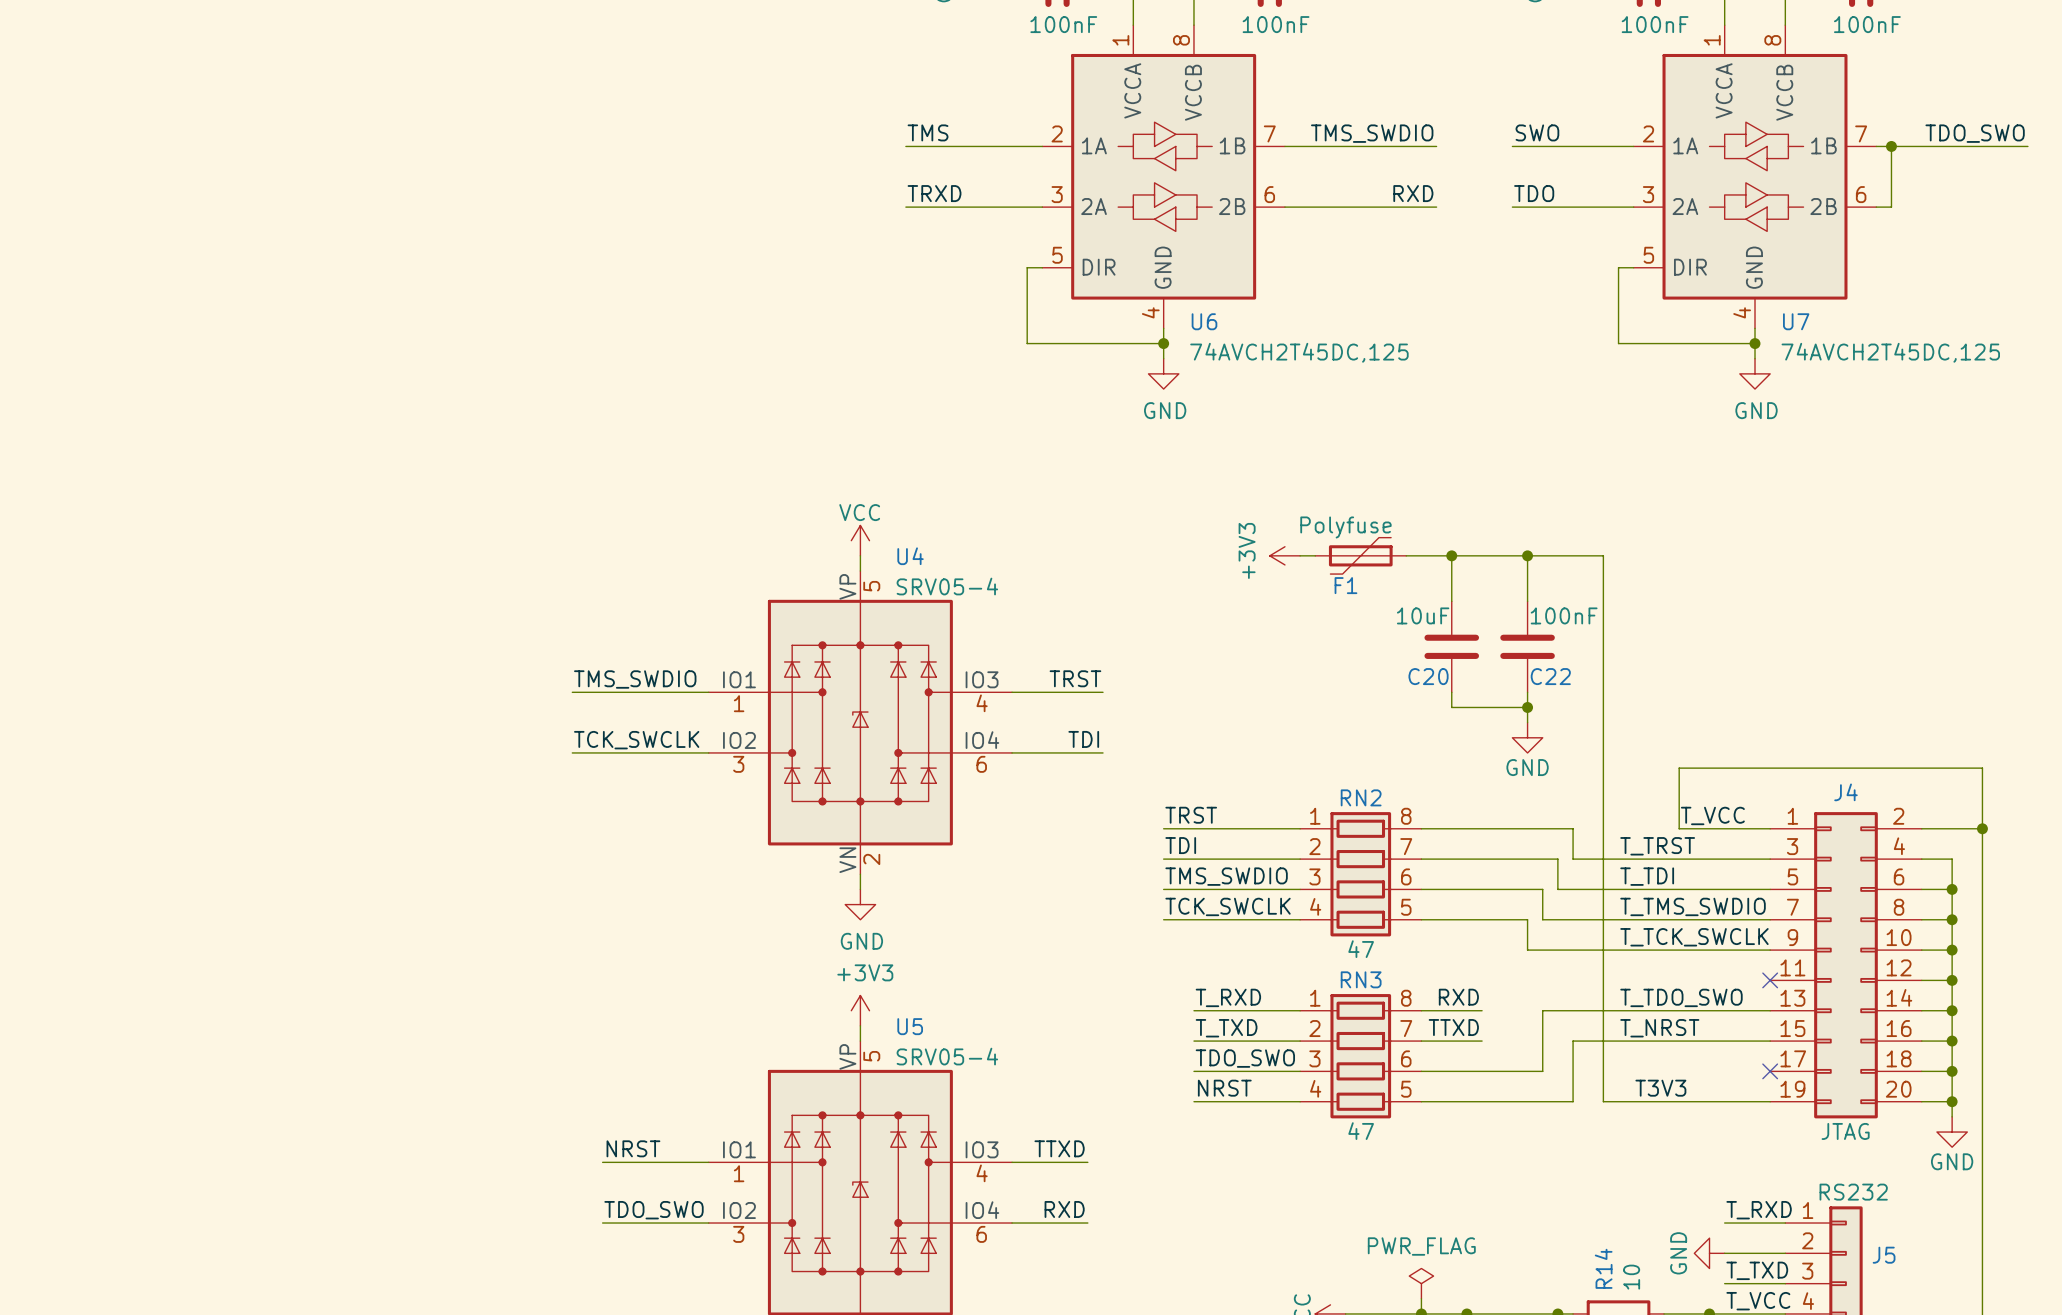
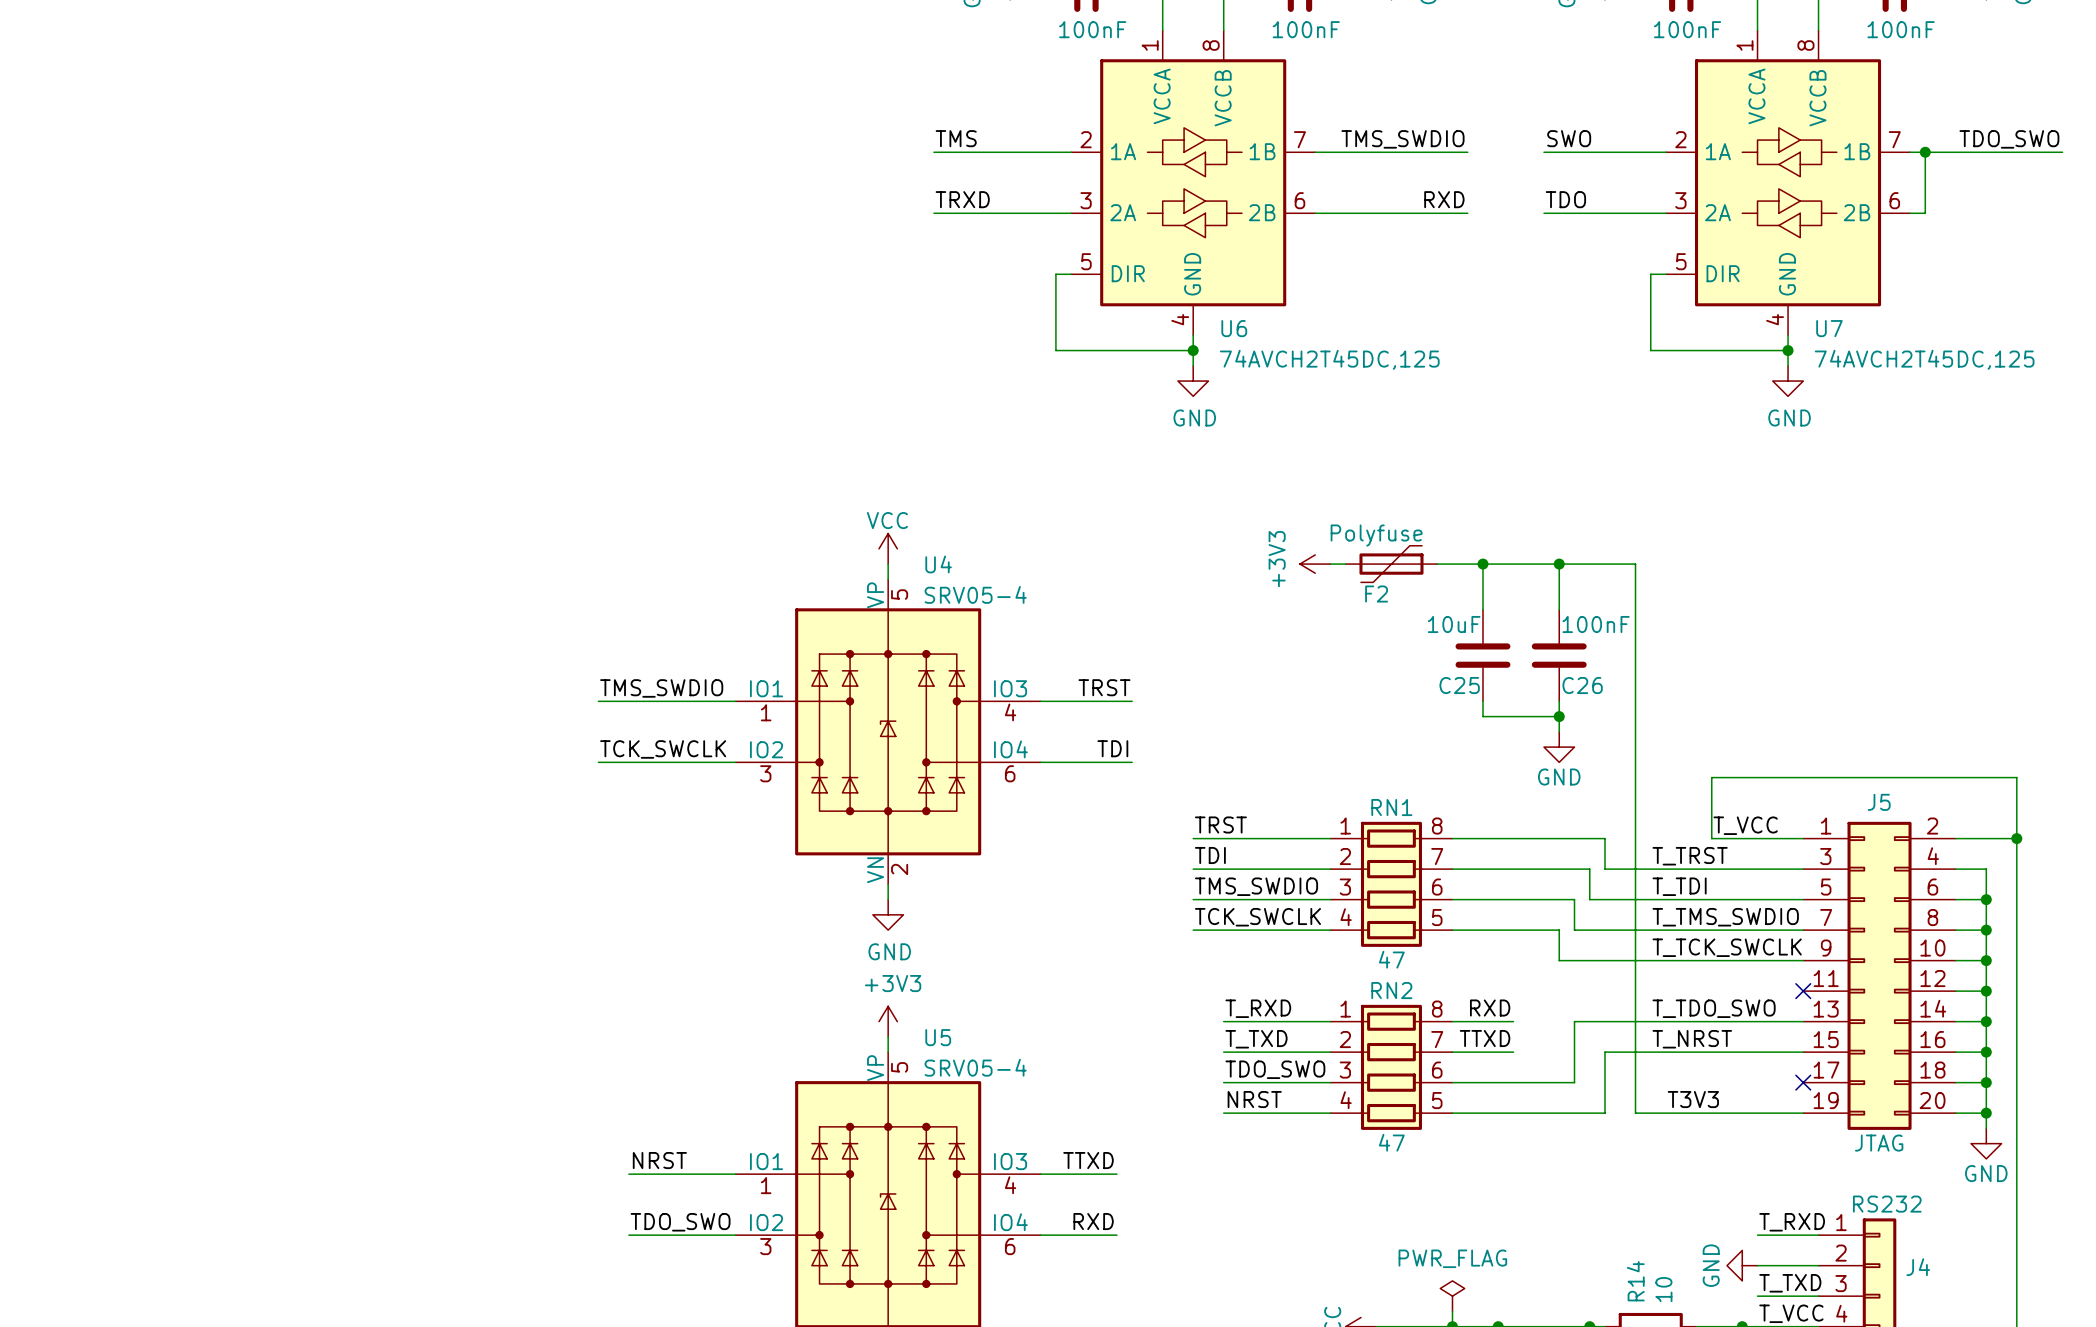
F1 name: F1 (1345, 585) -> F2 (1376, 594)
C20 name: C20 (1428, 676) -> C25 (1459, 685)
C22 name: C22 (1550, 676) -> C26 (1582, 685)
J4 name: J4 (1845, 792) -> J5 (1879, 802)
RN2 name: RN2 (1361, 797) -> RN1 (1391, 807)
RN3 name: RN3 (1361, 979) -> RN2 (1391, 990)
J5 name: J5 (1884, 1255) -> J4 (1918, 1267)

